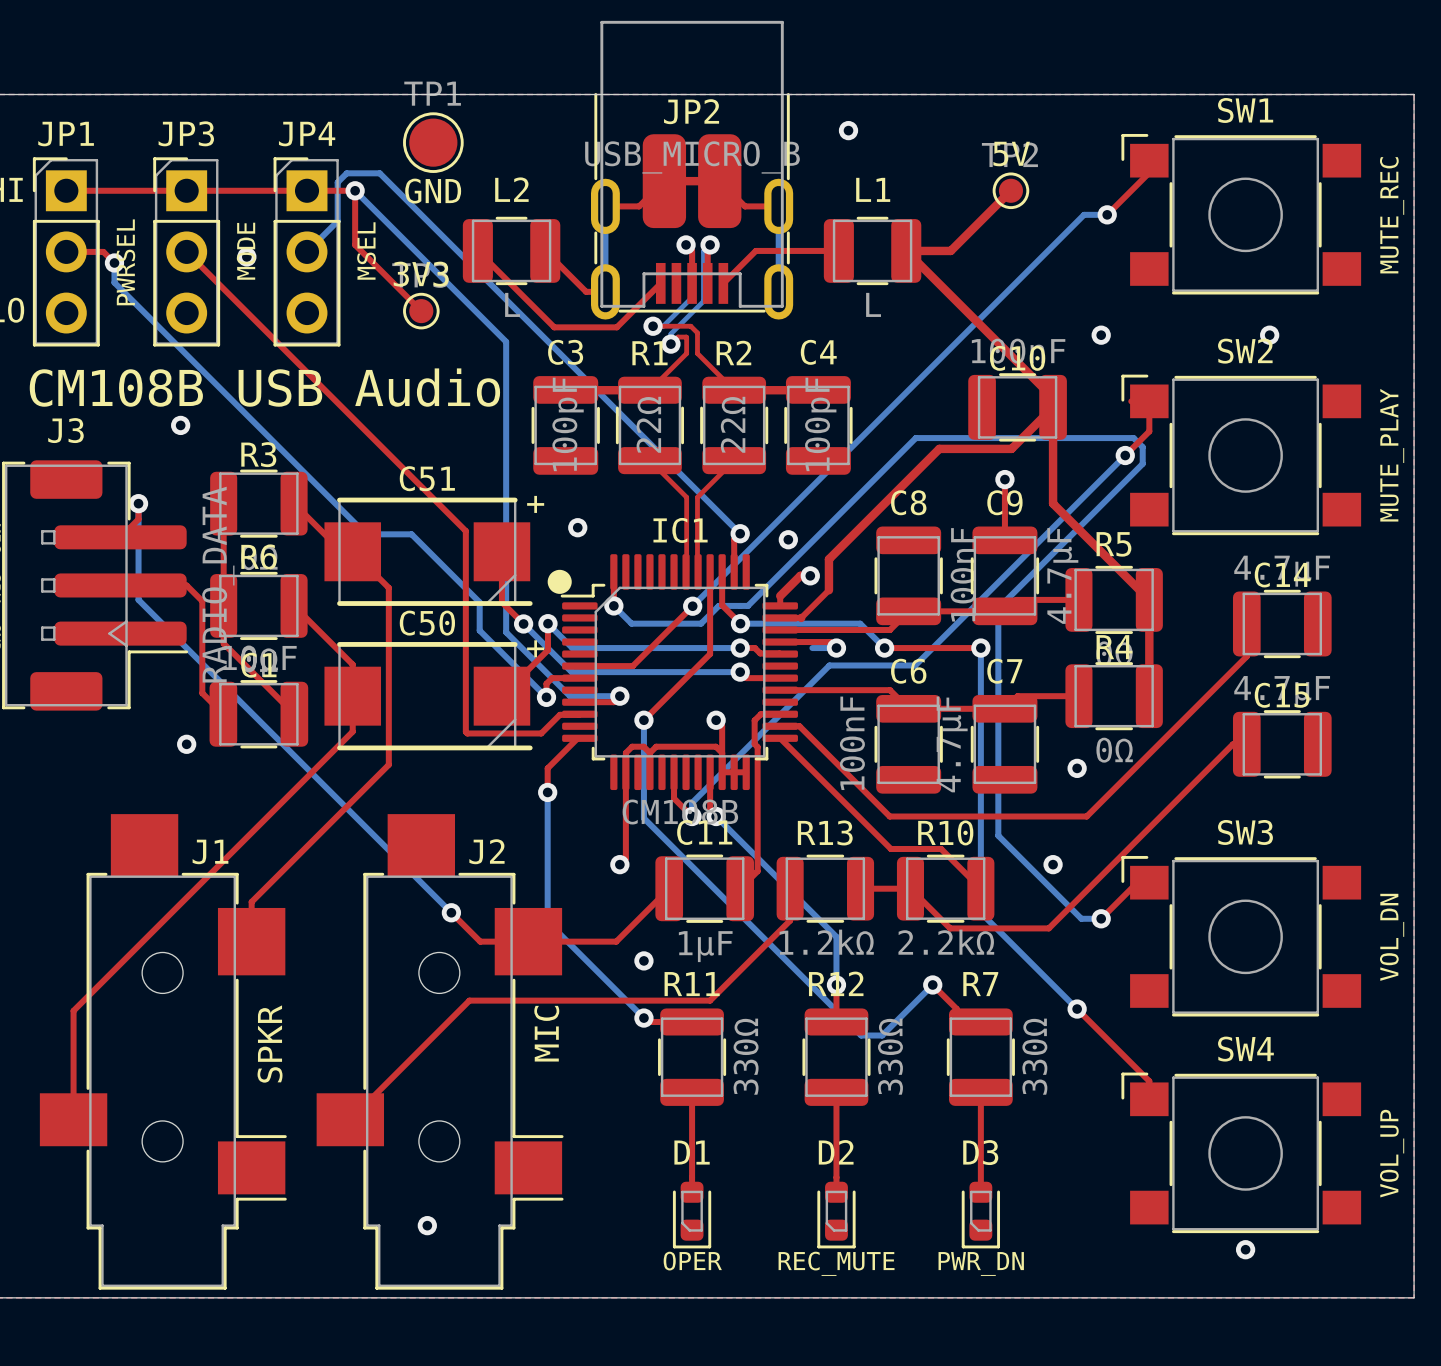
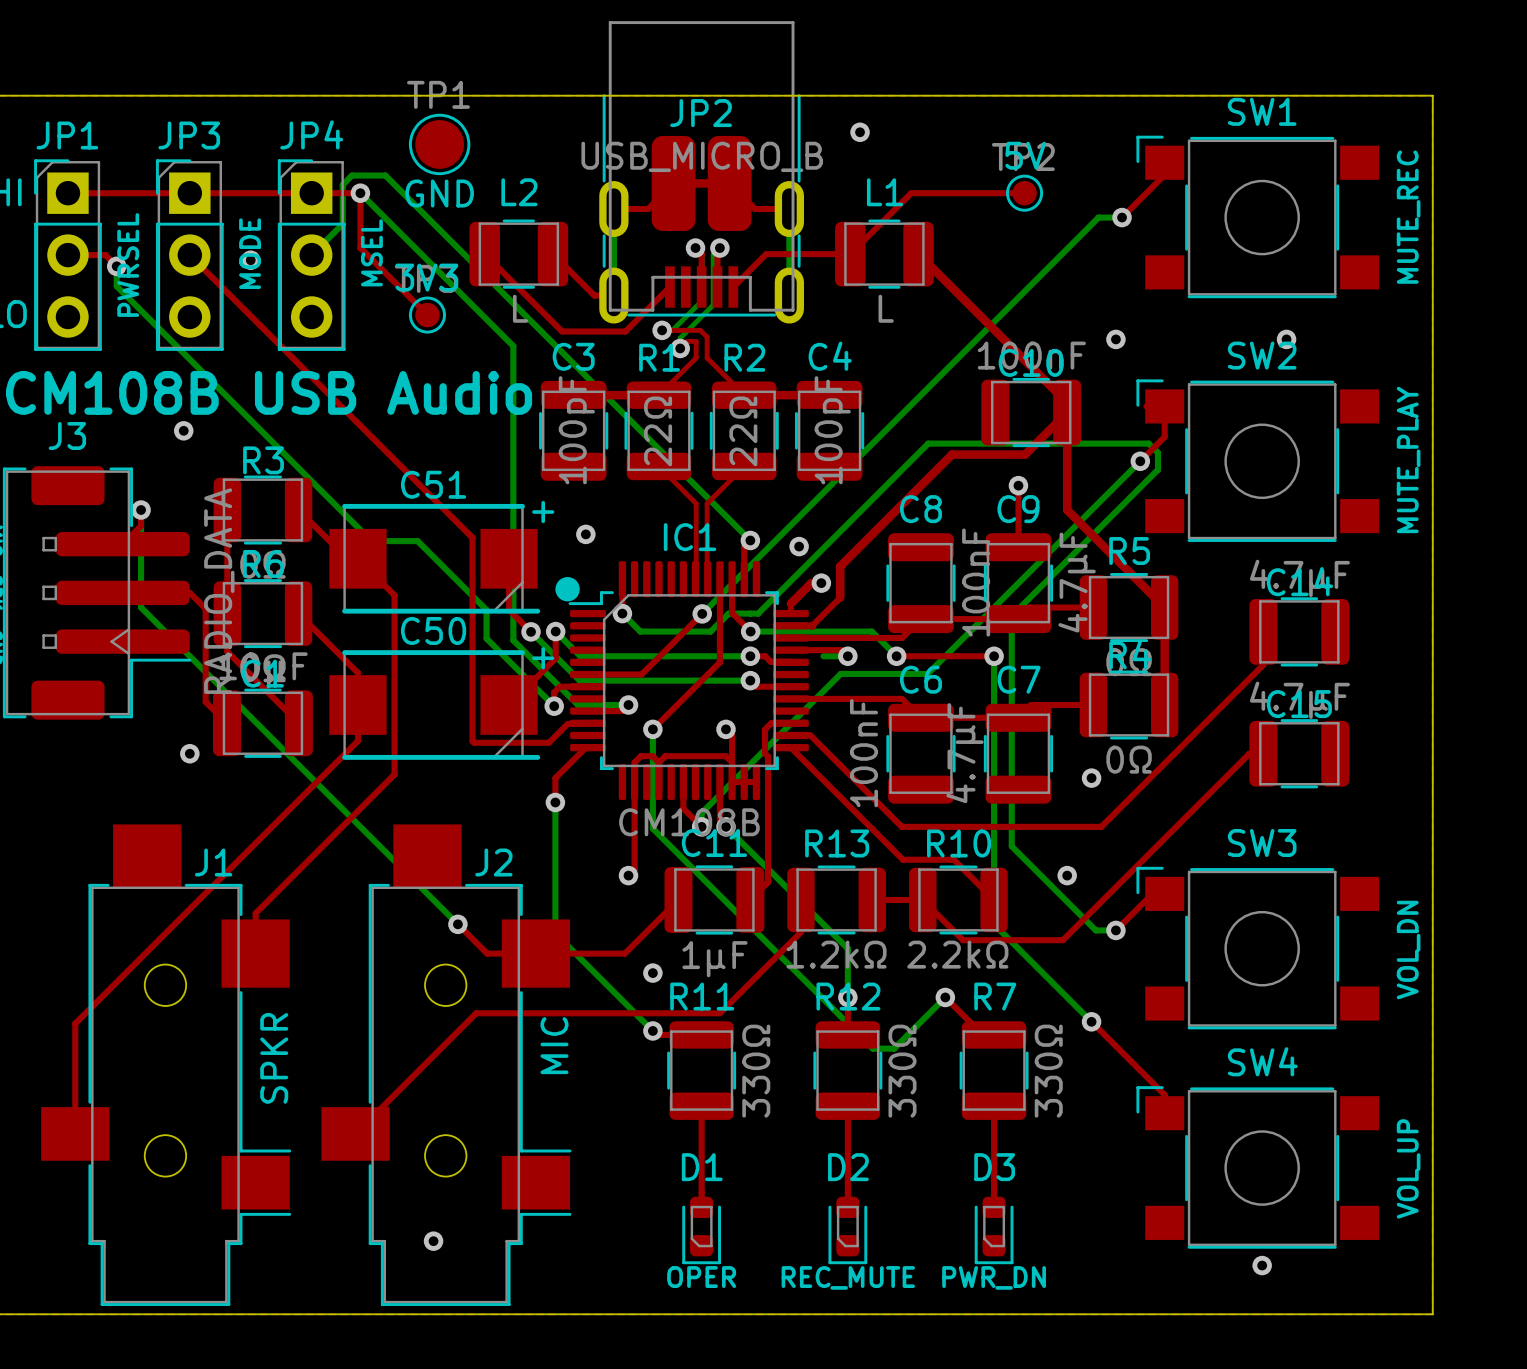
top track: (1010, 190) (950, 250) (906, 250) -> (1024, 193) (911, 193) (850, 254)

